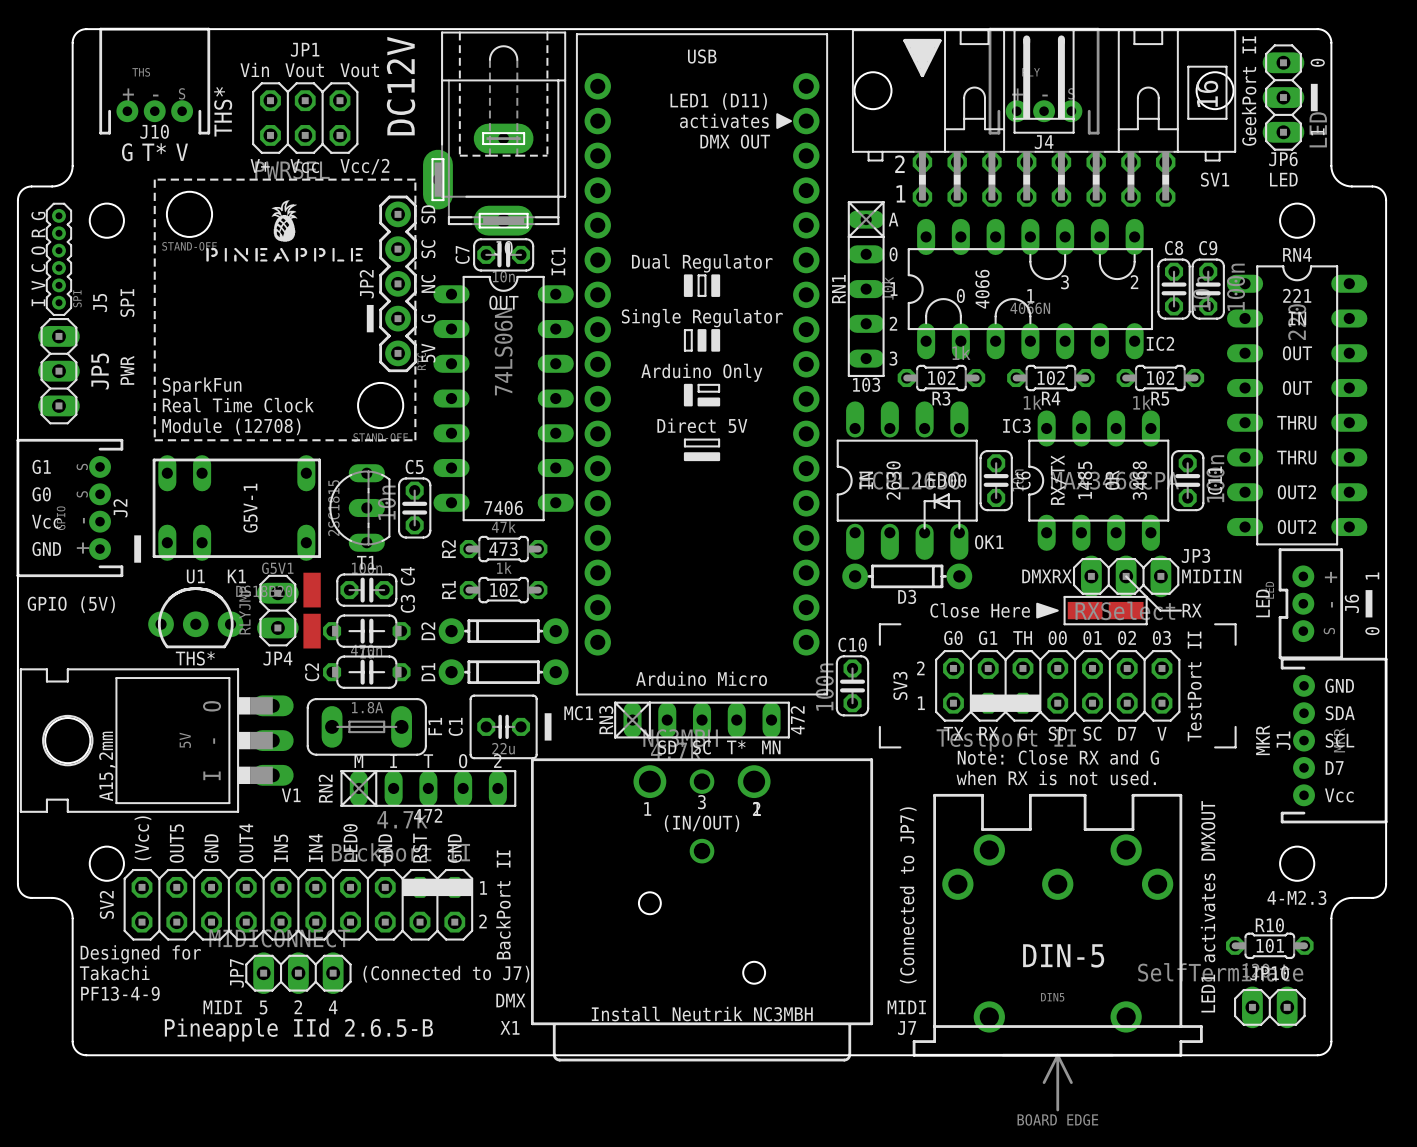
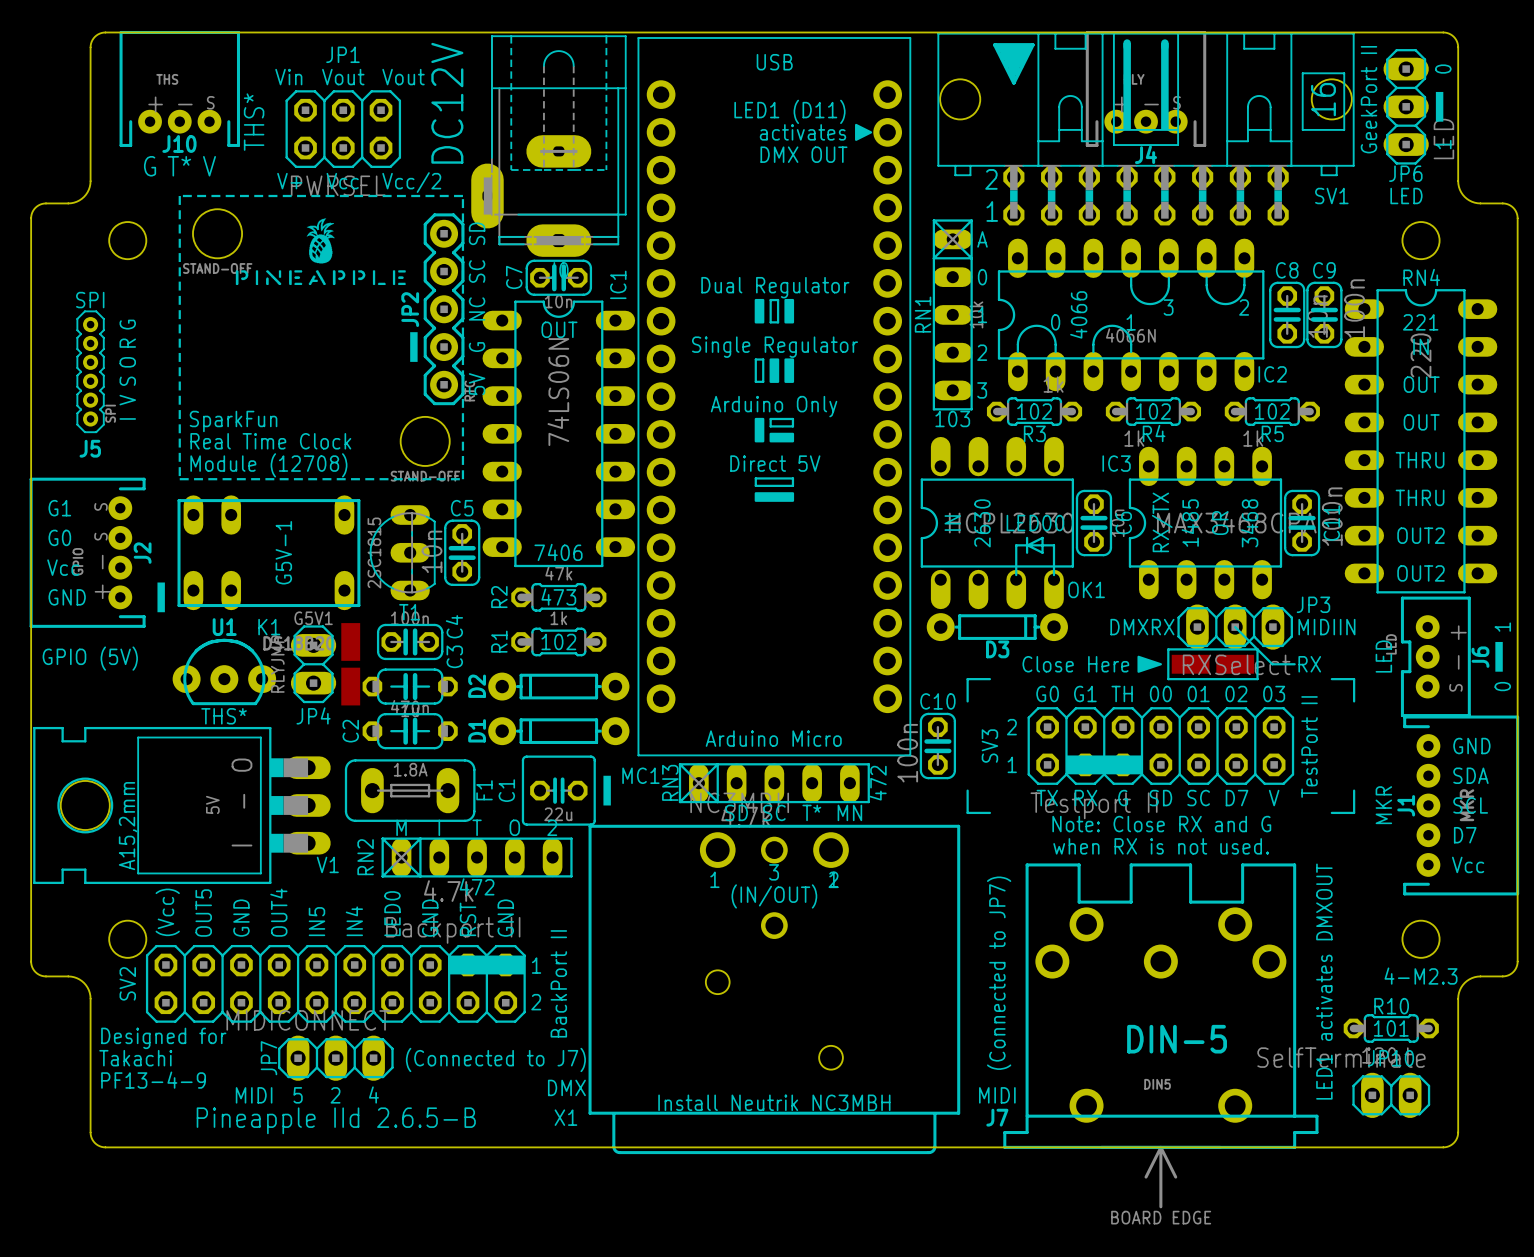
text position: G (38, 215) -> G (127, 324)
text position: R (38, 232) -> R (127, 343)
text position: O (38, 250) -> O (127, 362)
J5 position: (58, 259) -> (90, 371)
text: C (38, 268) -> none
text position: V (38, 285) -> V (127, 400)
text position: I (38, 302) -> I (127, 418)
J5 name rotation: 0° (100, 302) -> 90° clockwise (90, 448)
J5 name position: J5 (100, 302) -> J5 (90, 448)
text rotation: 0° (127, 303) -> 90° clockwise (90, 300)
text position: SPI (127, 303) -> SPI (90, 300)
text: none -> S (127, 381)
text: PWR (127, 370) -> none
JP5: (58, 371) -> none

